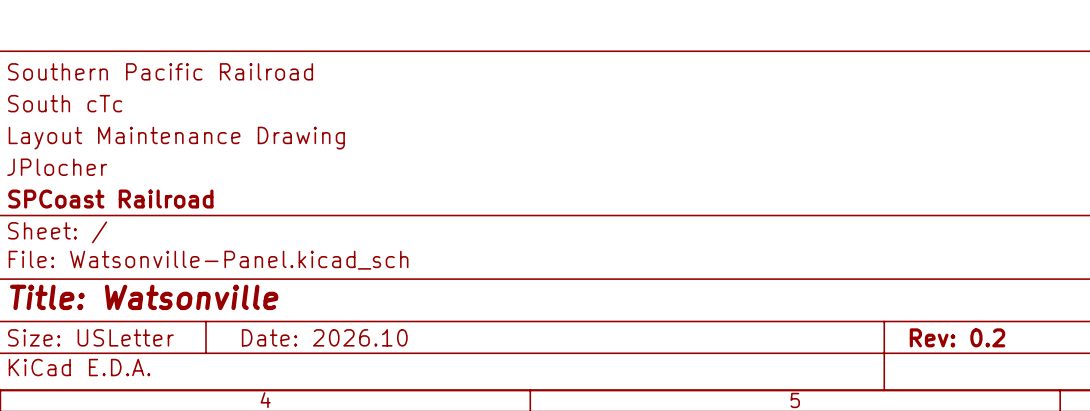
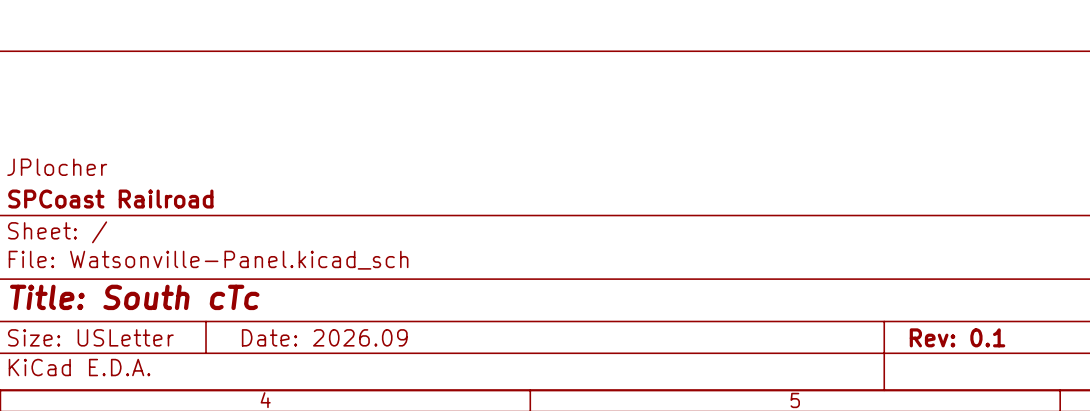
title block: Southern Pacific Railroad (160, 71) -> none
title block: South cTc (65, 103) -> none
title block: Layout Maintenance Drawing (176, 138) -> none
title block: Title: Watsonville (144, 297) -> Title: South cTc (134, 297)
title block: Date: 2026.10 (324, 337) -> Date: 2026.09 (324, 337)
title block: Rev: 0.2 (957, 337) -> Rev: 0.1 (957, 337)

